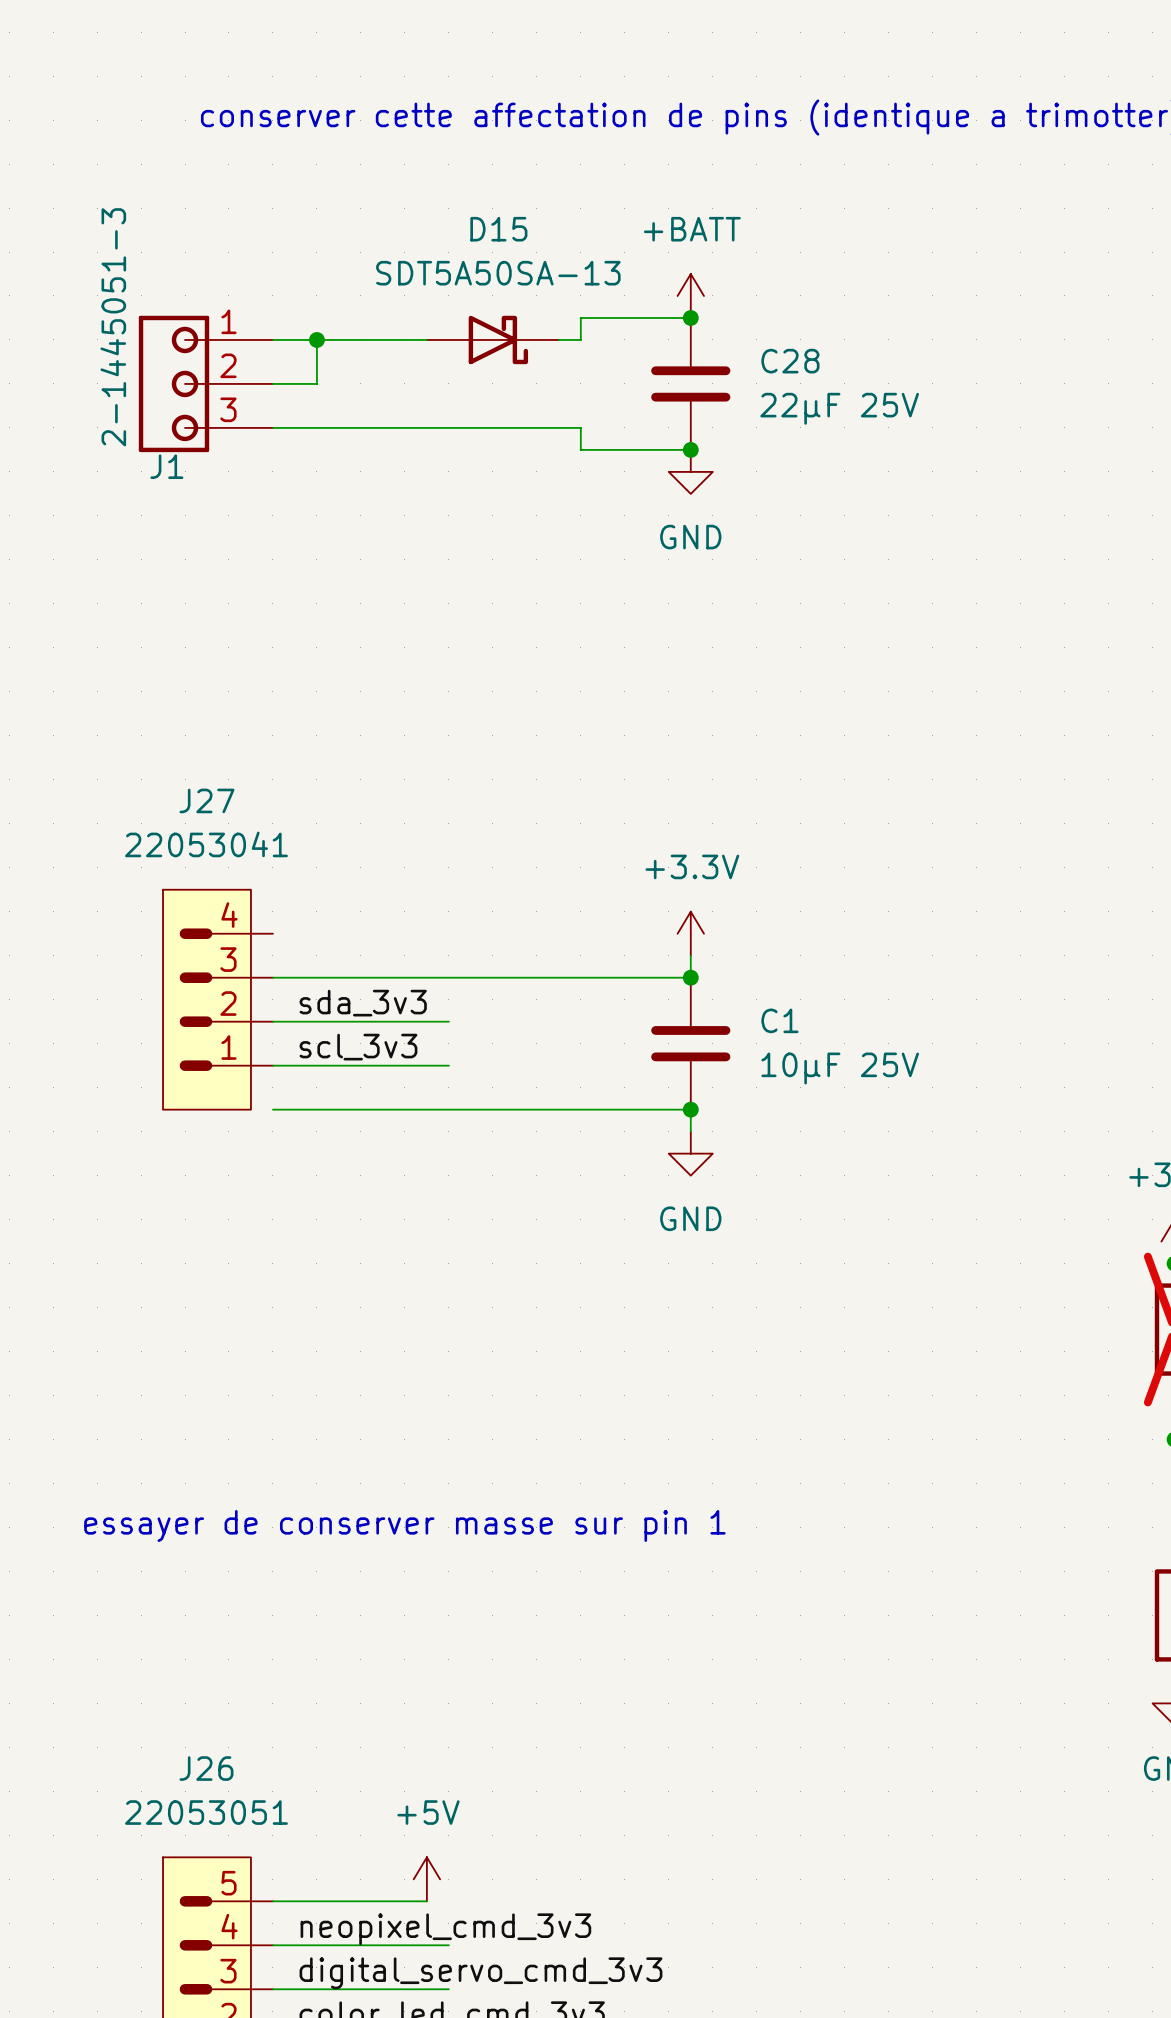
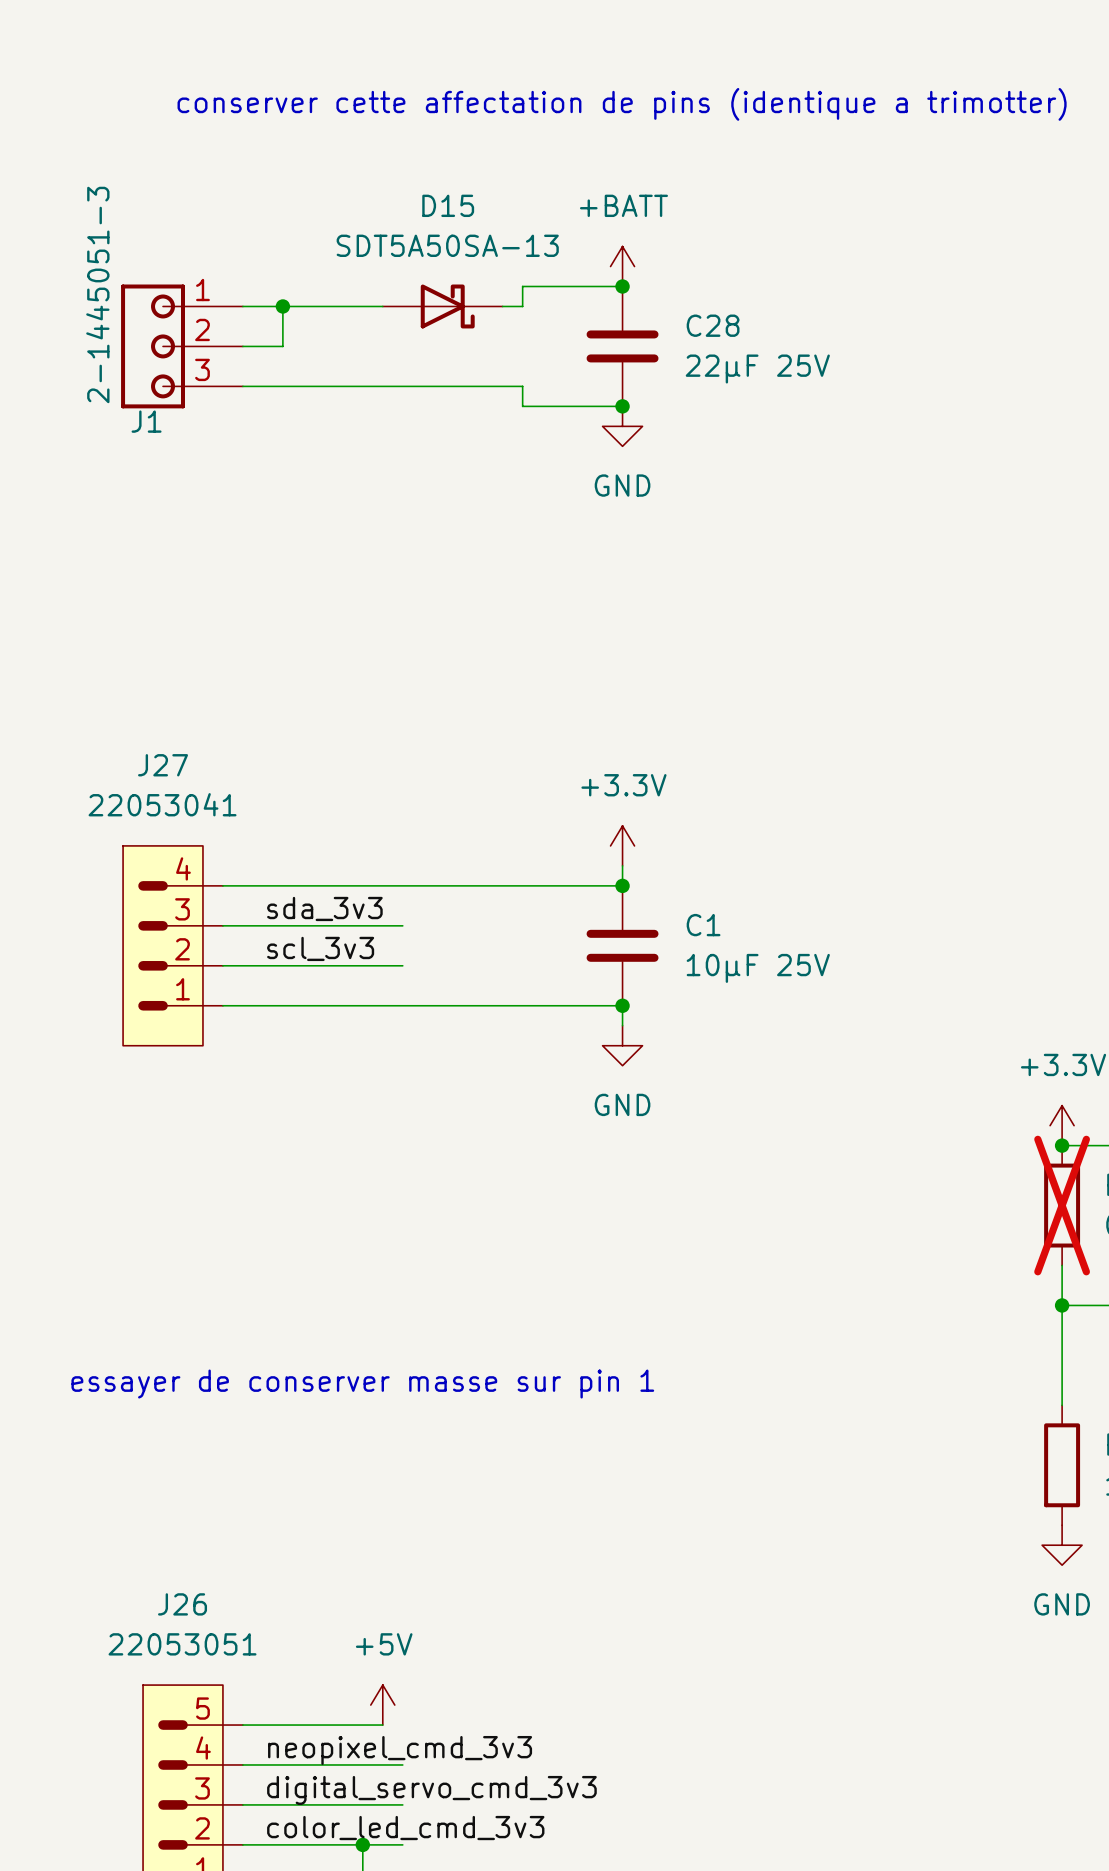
J27 position: (217, 999) -> (173, 945)
wire: none -> (222, 1005) (242, 1005)

